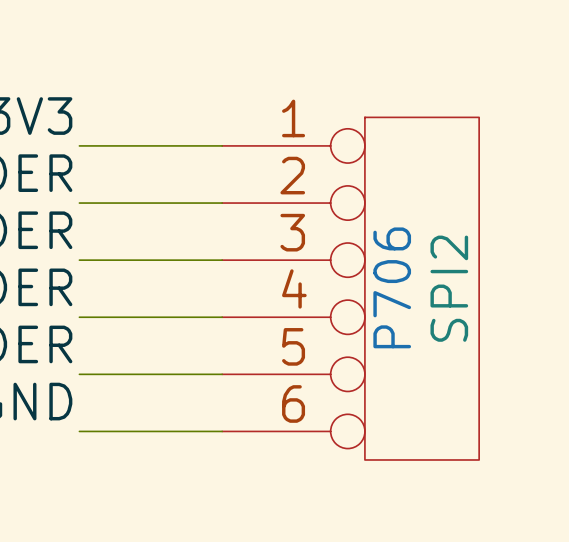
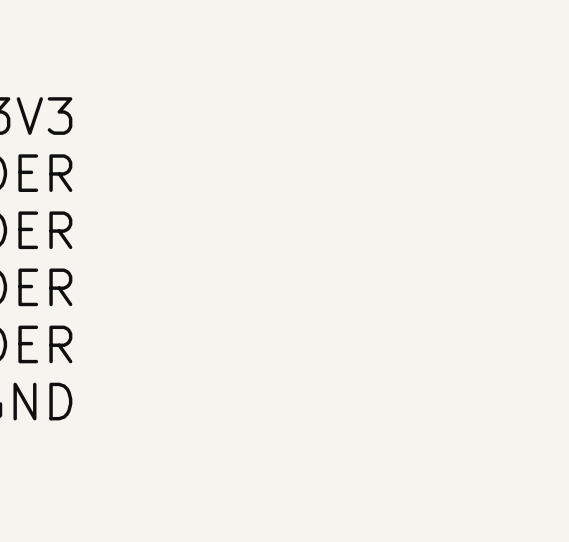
wire: (79, 145) (222, 145) -> none
wire: (79, 203) (222, 203) -> none
wire: (79, 260) (222, 260) -> none
P706: SPI2 (350, 288) -> none
wire: (79, 317) (222, 317) -> none
wire: (79, 374) (222, 374) -> none
wire: (79, 431) (222, 431) -> none

